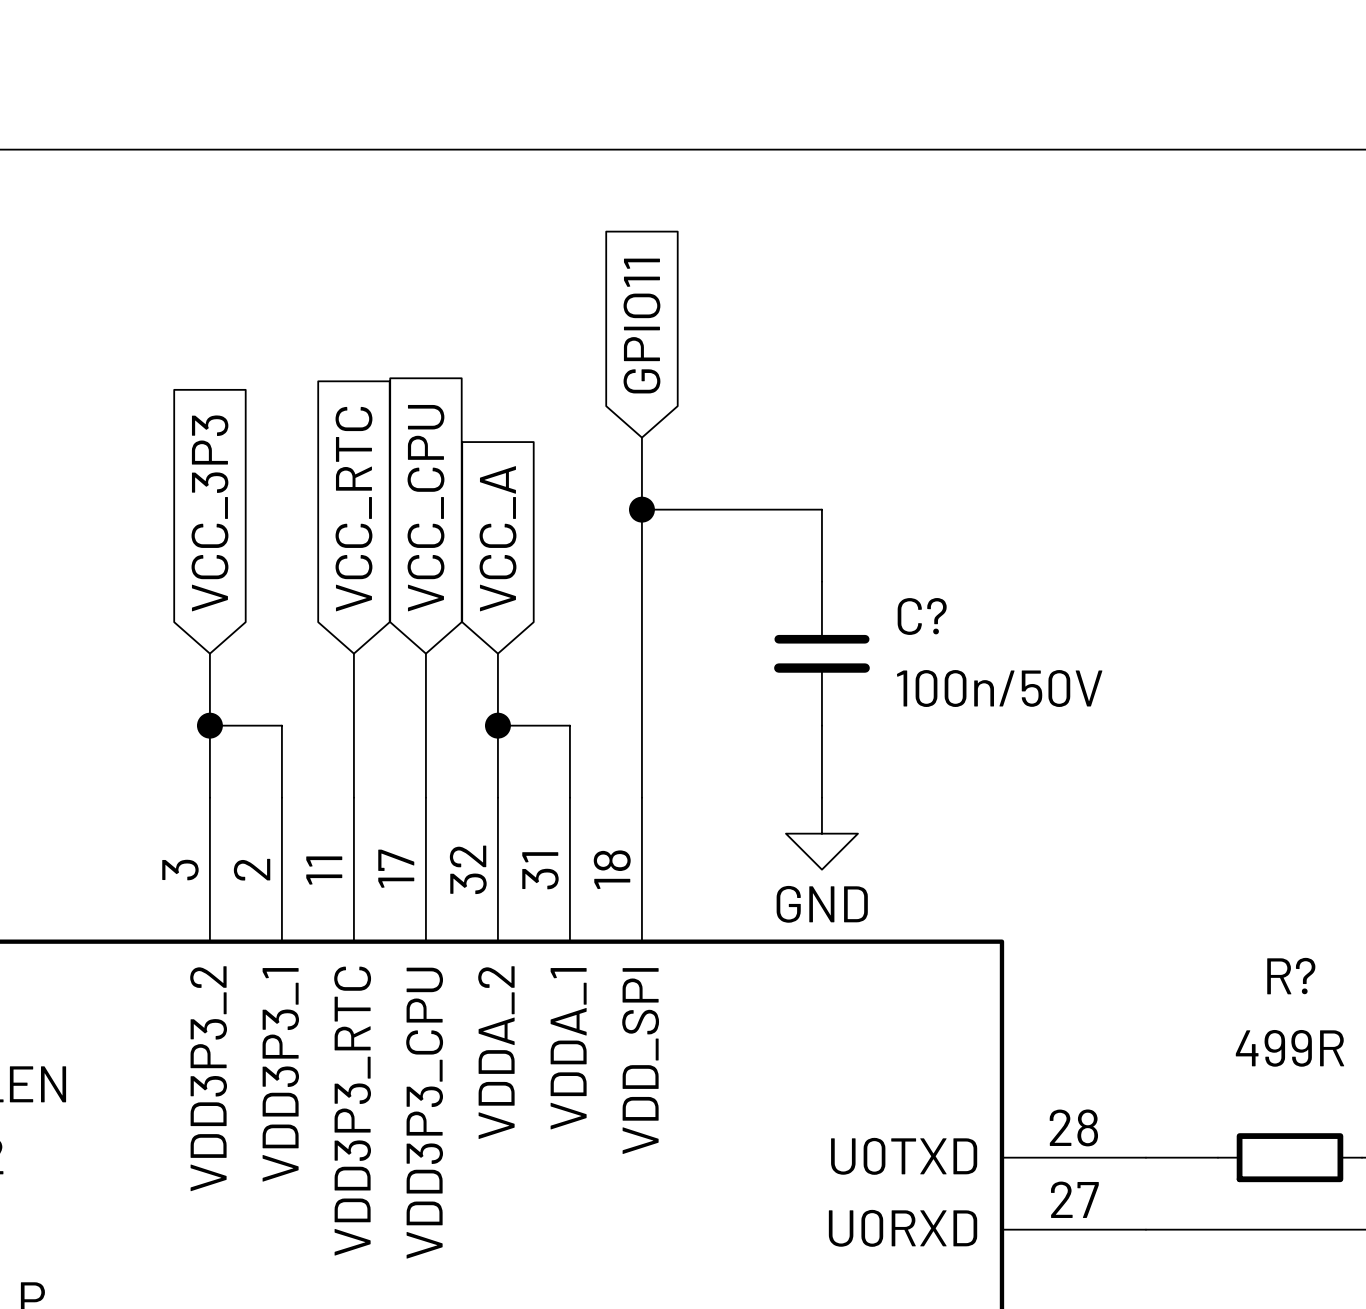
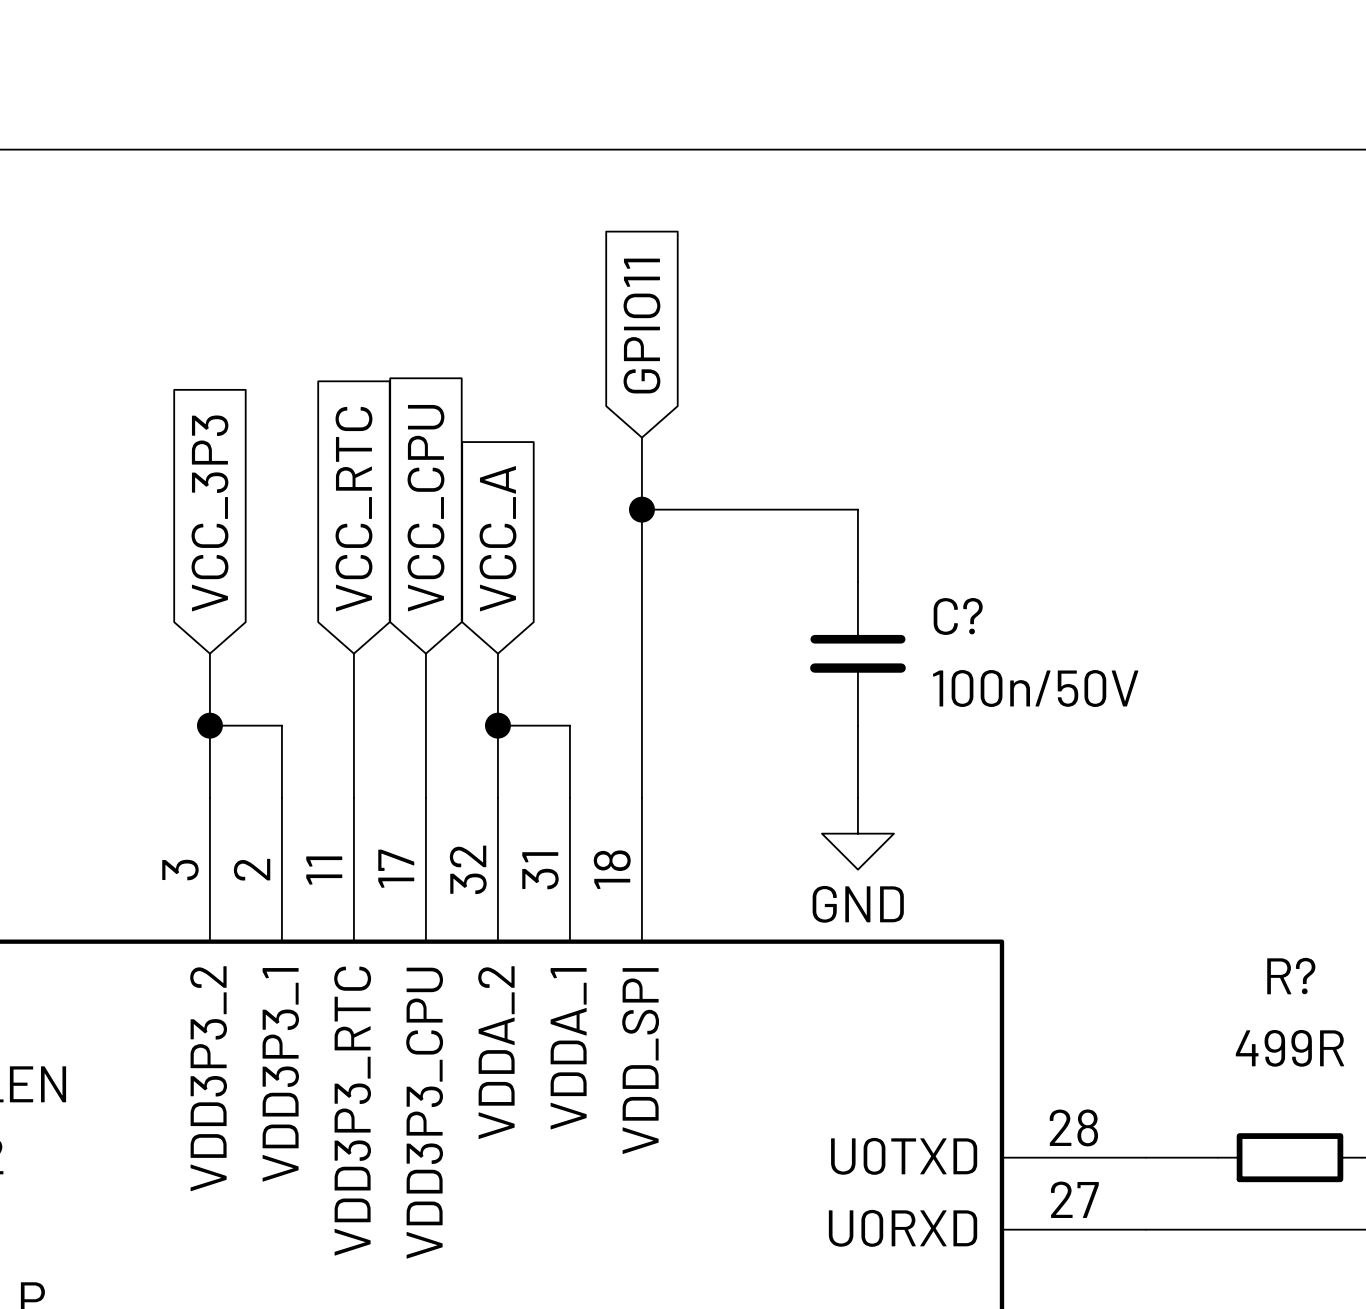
wire: (821, 509) (821, 581) -> (821, 509) (857, 509) (857, 581)
C? position: (821, 653) -> (857, 653)
wire: (821, 725) (821, 797) -> (857, 725) (857, 797)
power symbol position: GND (821, 833) -> GND (857, 833)

